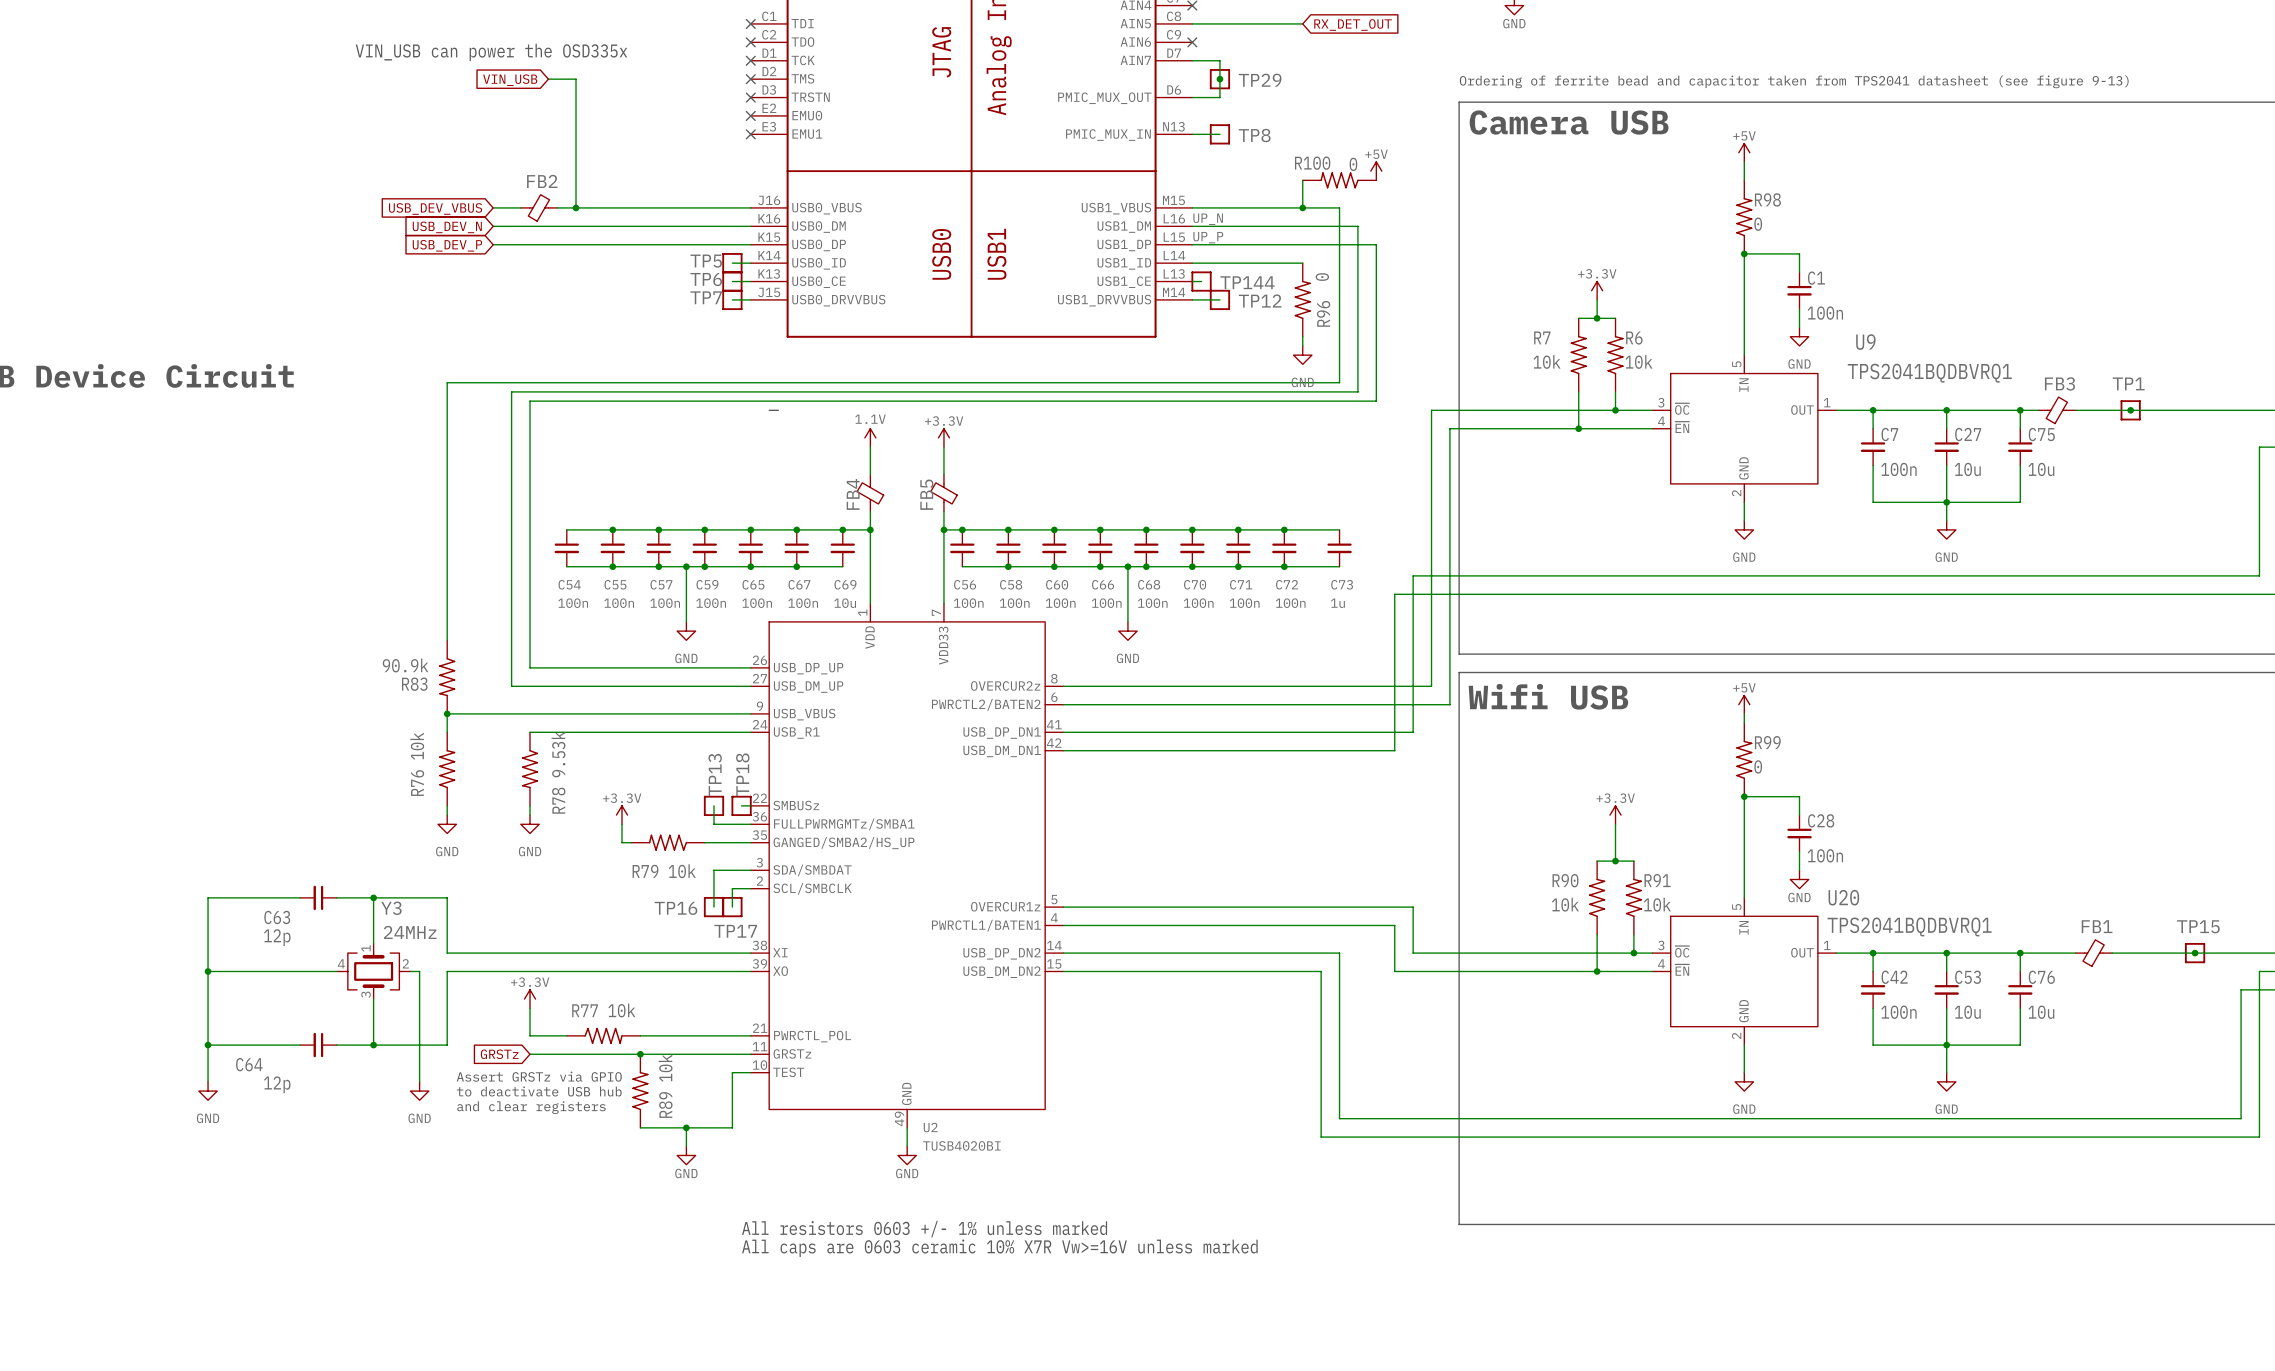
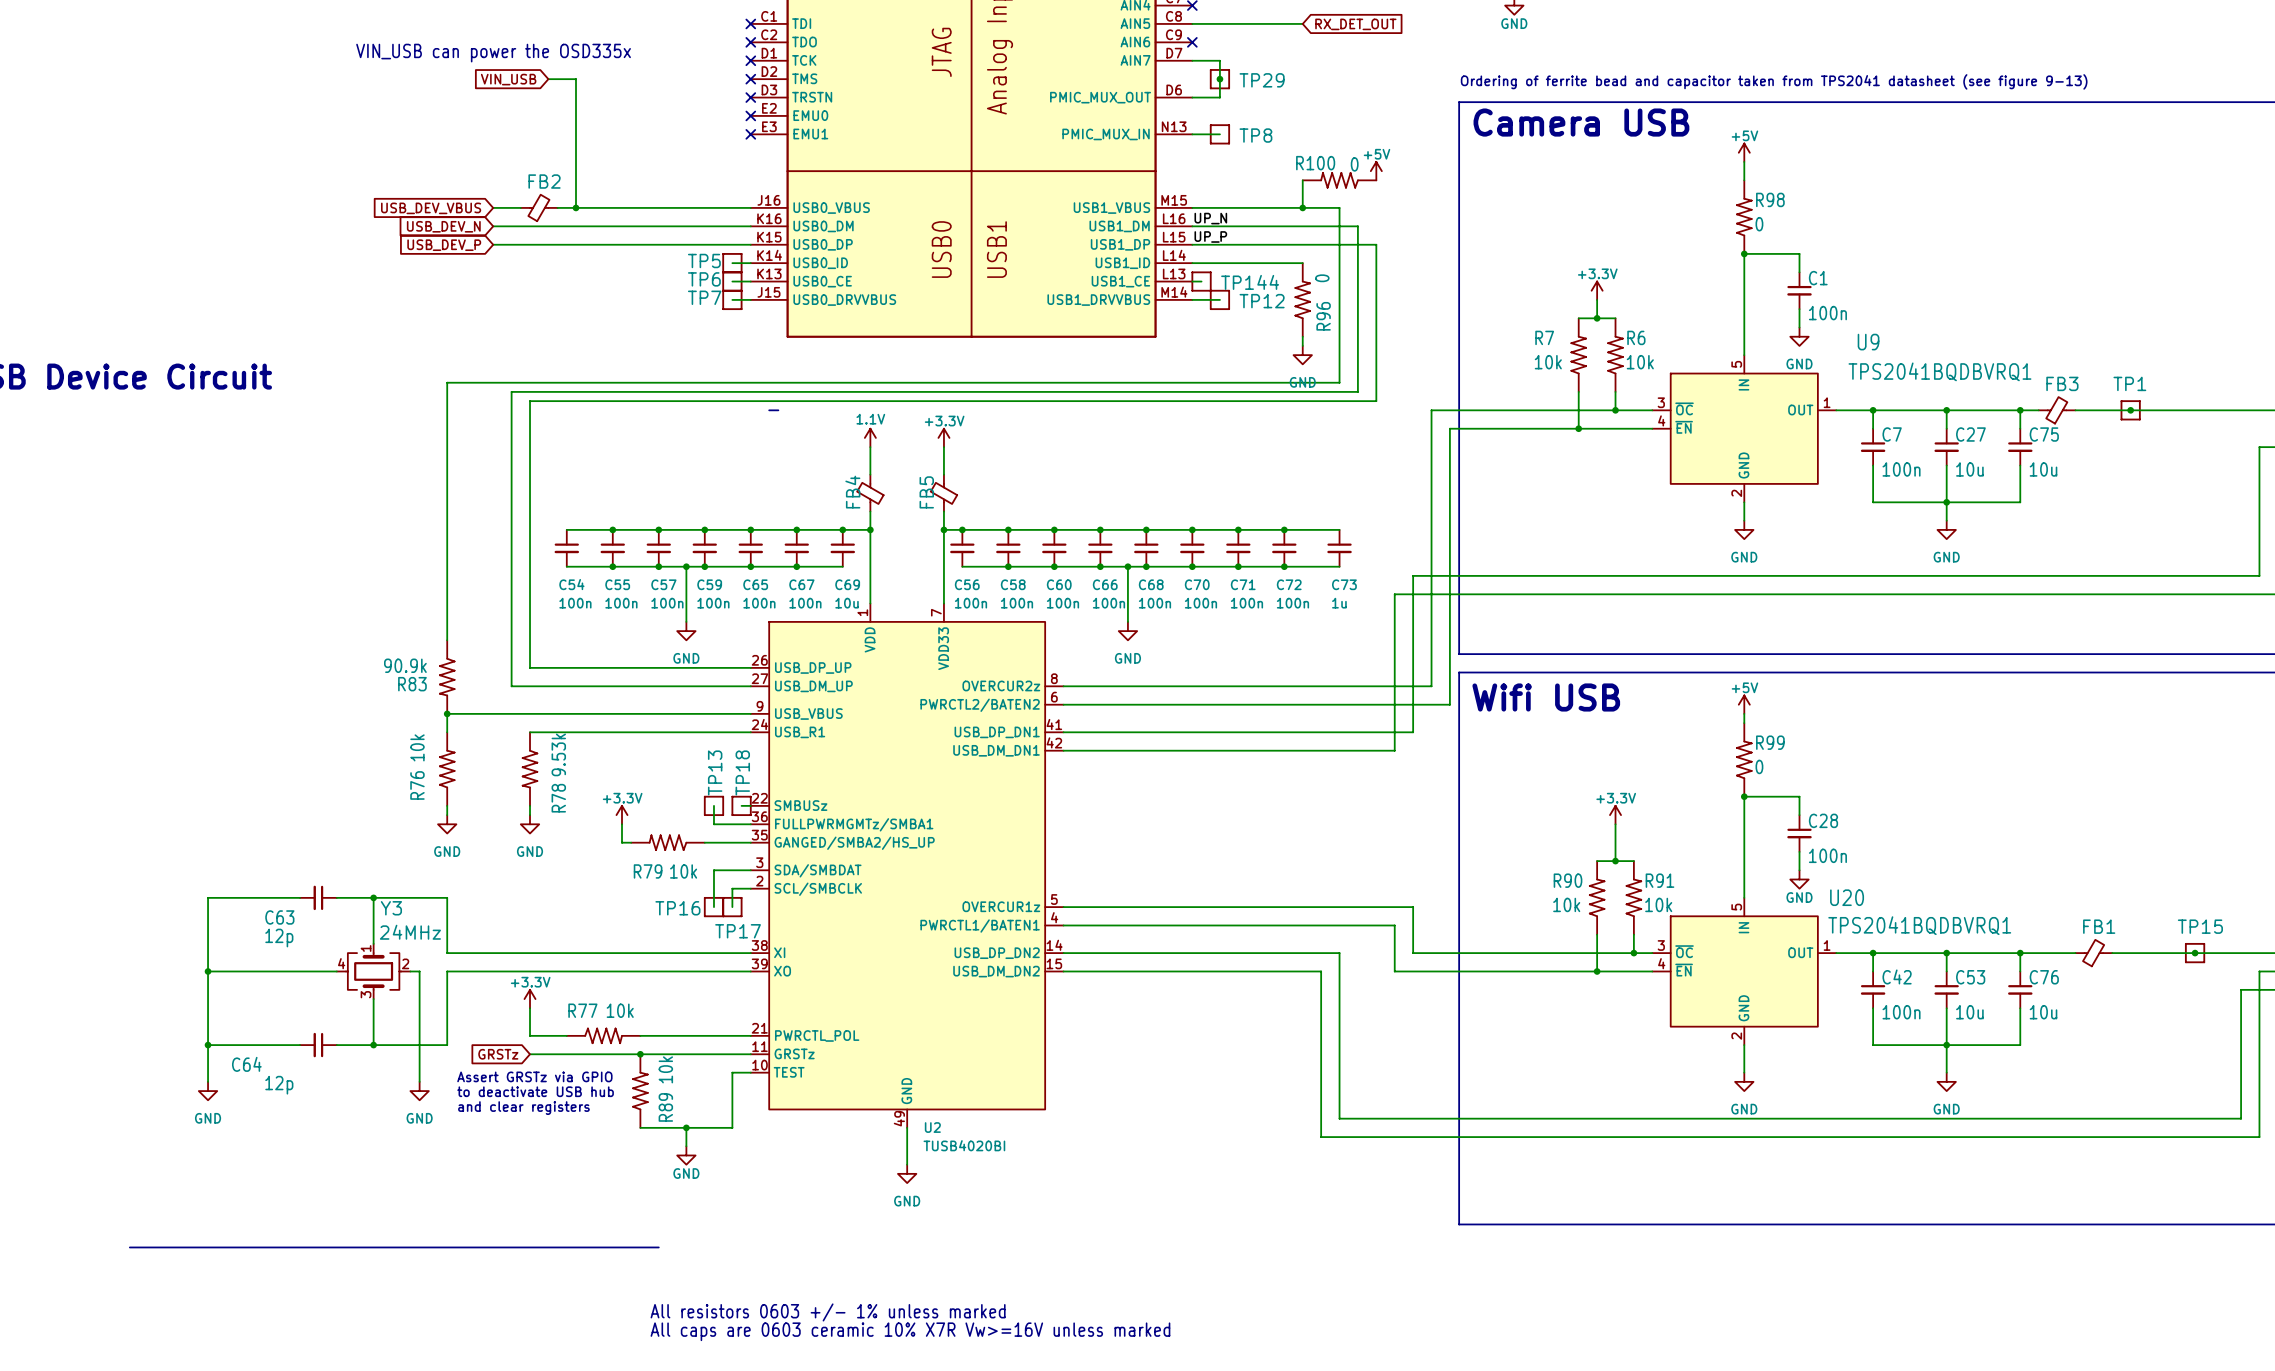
power symbol position: GND (907, 1155) -> GND (907, 1173)
power symbol text position: GND (907, 1173) -> GND (907, 1201)
text position: All resistors 0603 +/- 1% unless marked (924, 1229) -> All resistors 0603 +/- 1% unless marked (828, 1312)
line: none -> (129, 1247) (658, 1247)
text position: All caps are 0603 ceramic 10% X7R Vw>=16V unless marked (999, 1248) -> All caps are 0603 ceramic 10% X7R Vw>=16V unless marked (910, 1331)

